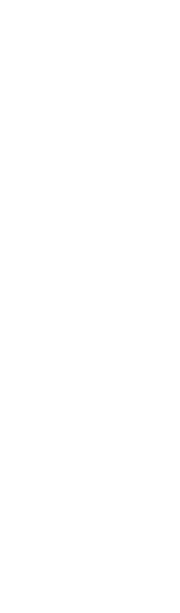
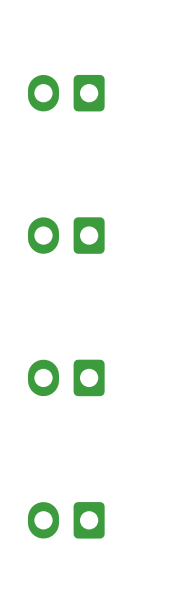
part: none -> (66, 93)
part: none -> (66, 235)
part: none -> (66, 377)
part: none -> (66, 520)

